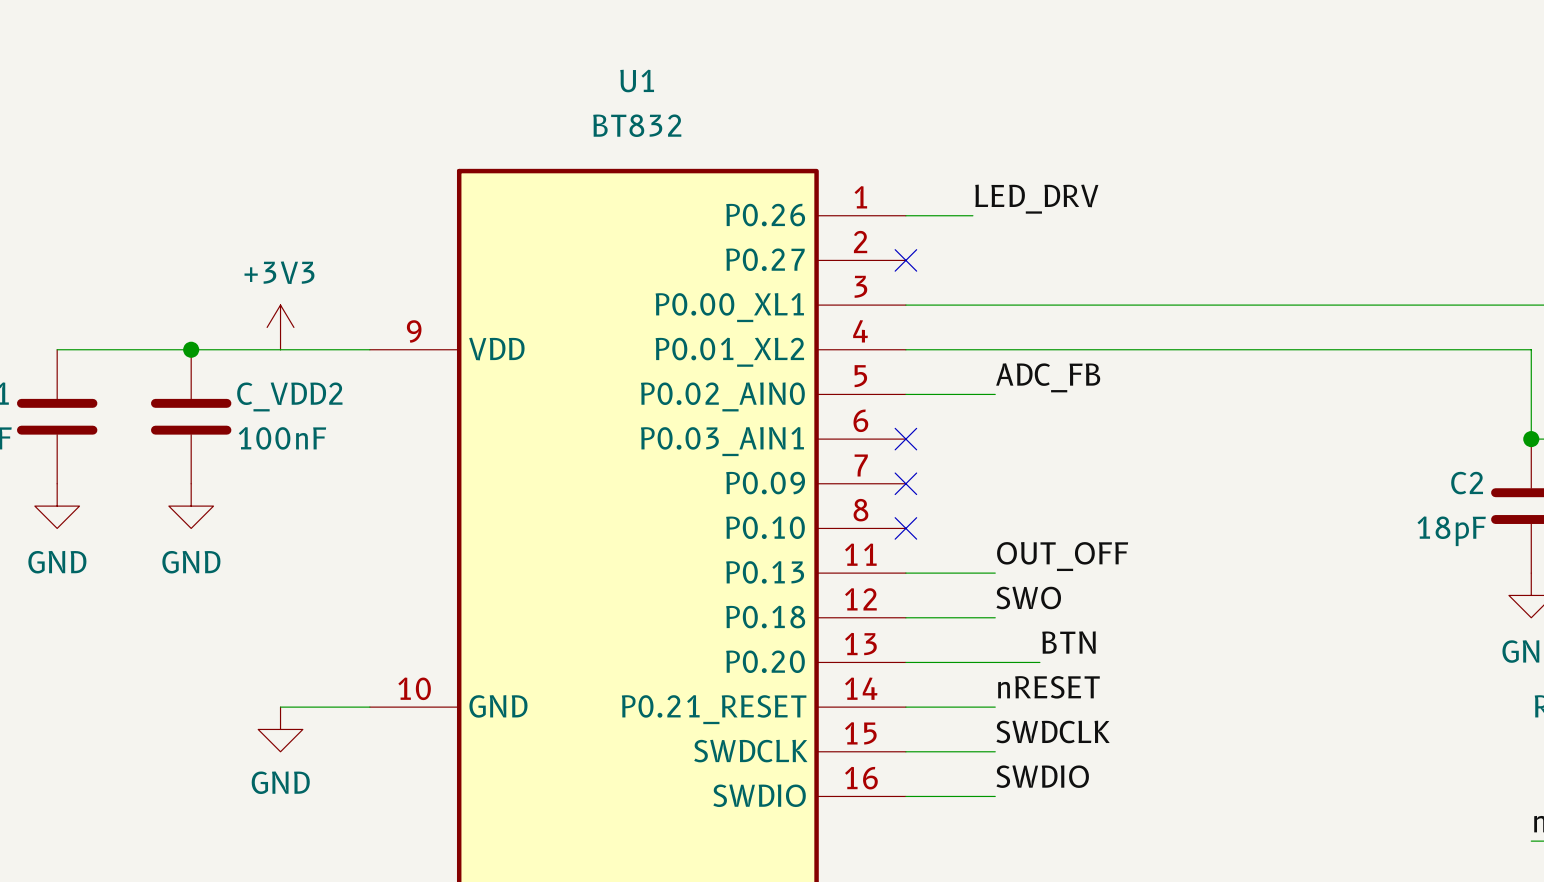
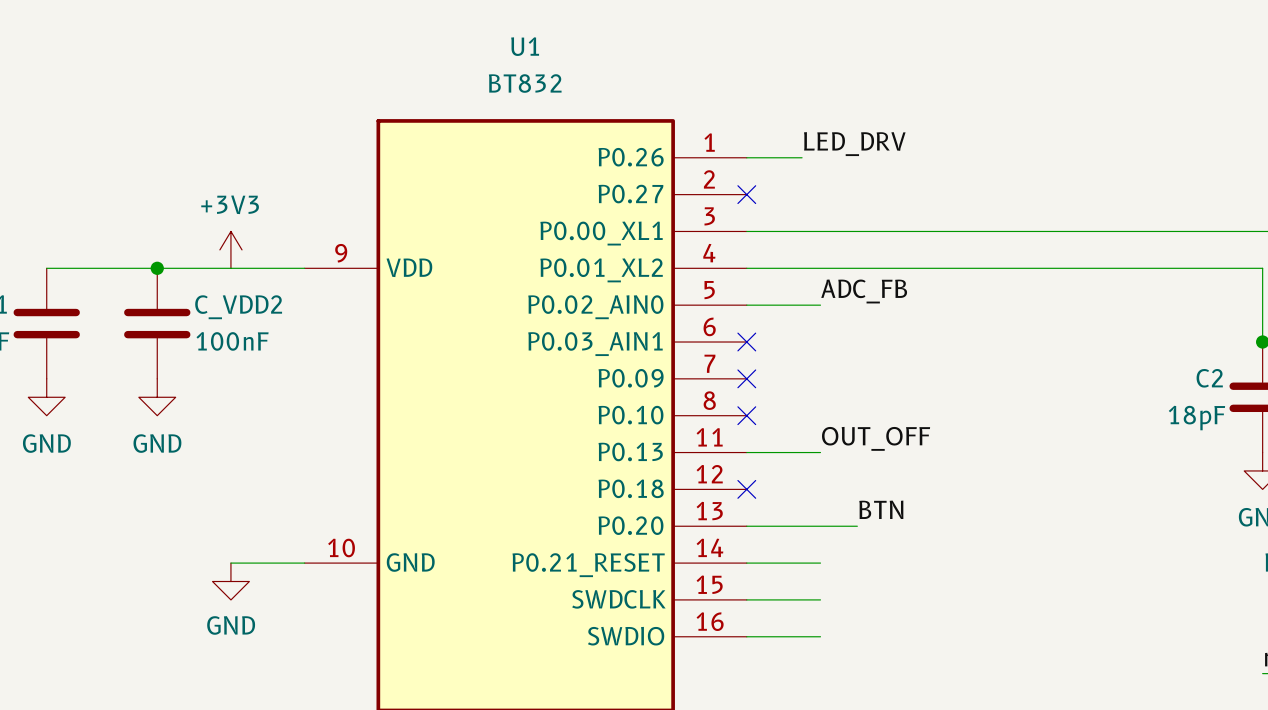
label: SWO (1028, 597) -> none
wire: (905, 617) (995, 617) -> none
no-connect mark: none -> (746, 489)
label: nRESET (1048, 687) -> none
label: SWDCLK (1053, 731) -> none
label: SWDIO (1042, 776) -> none

